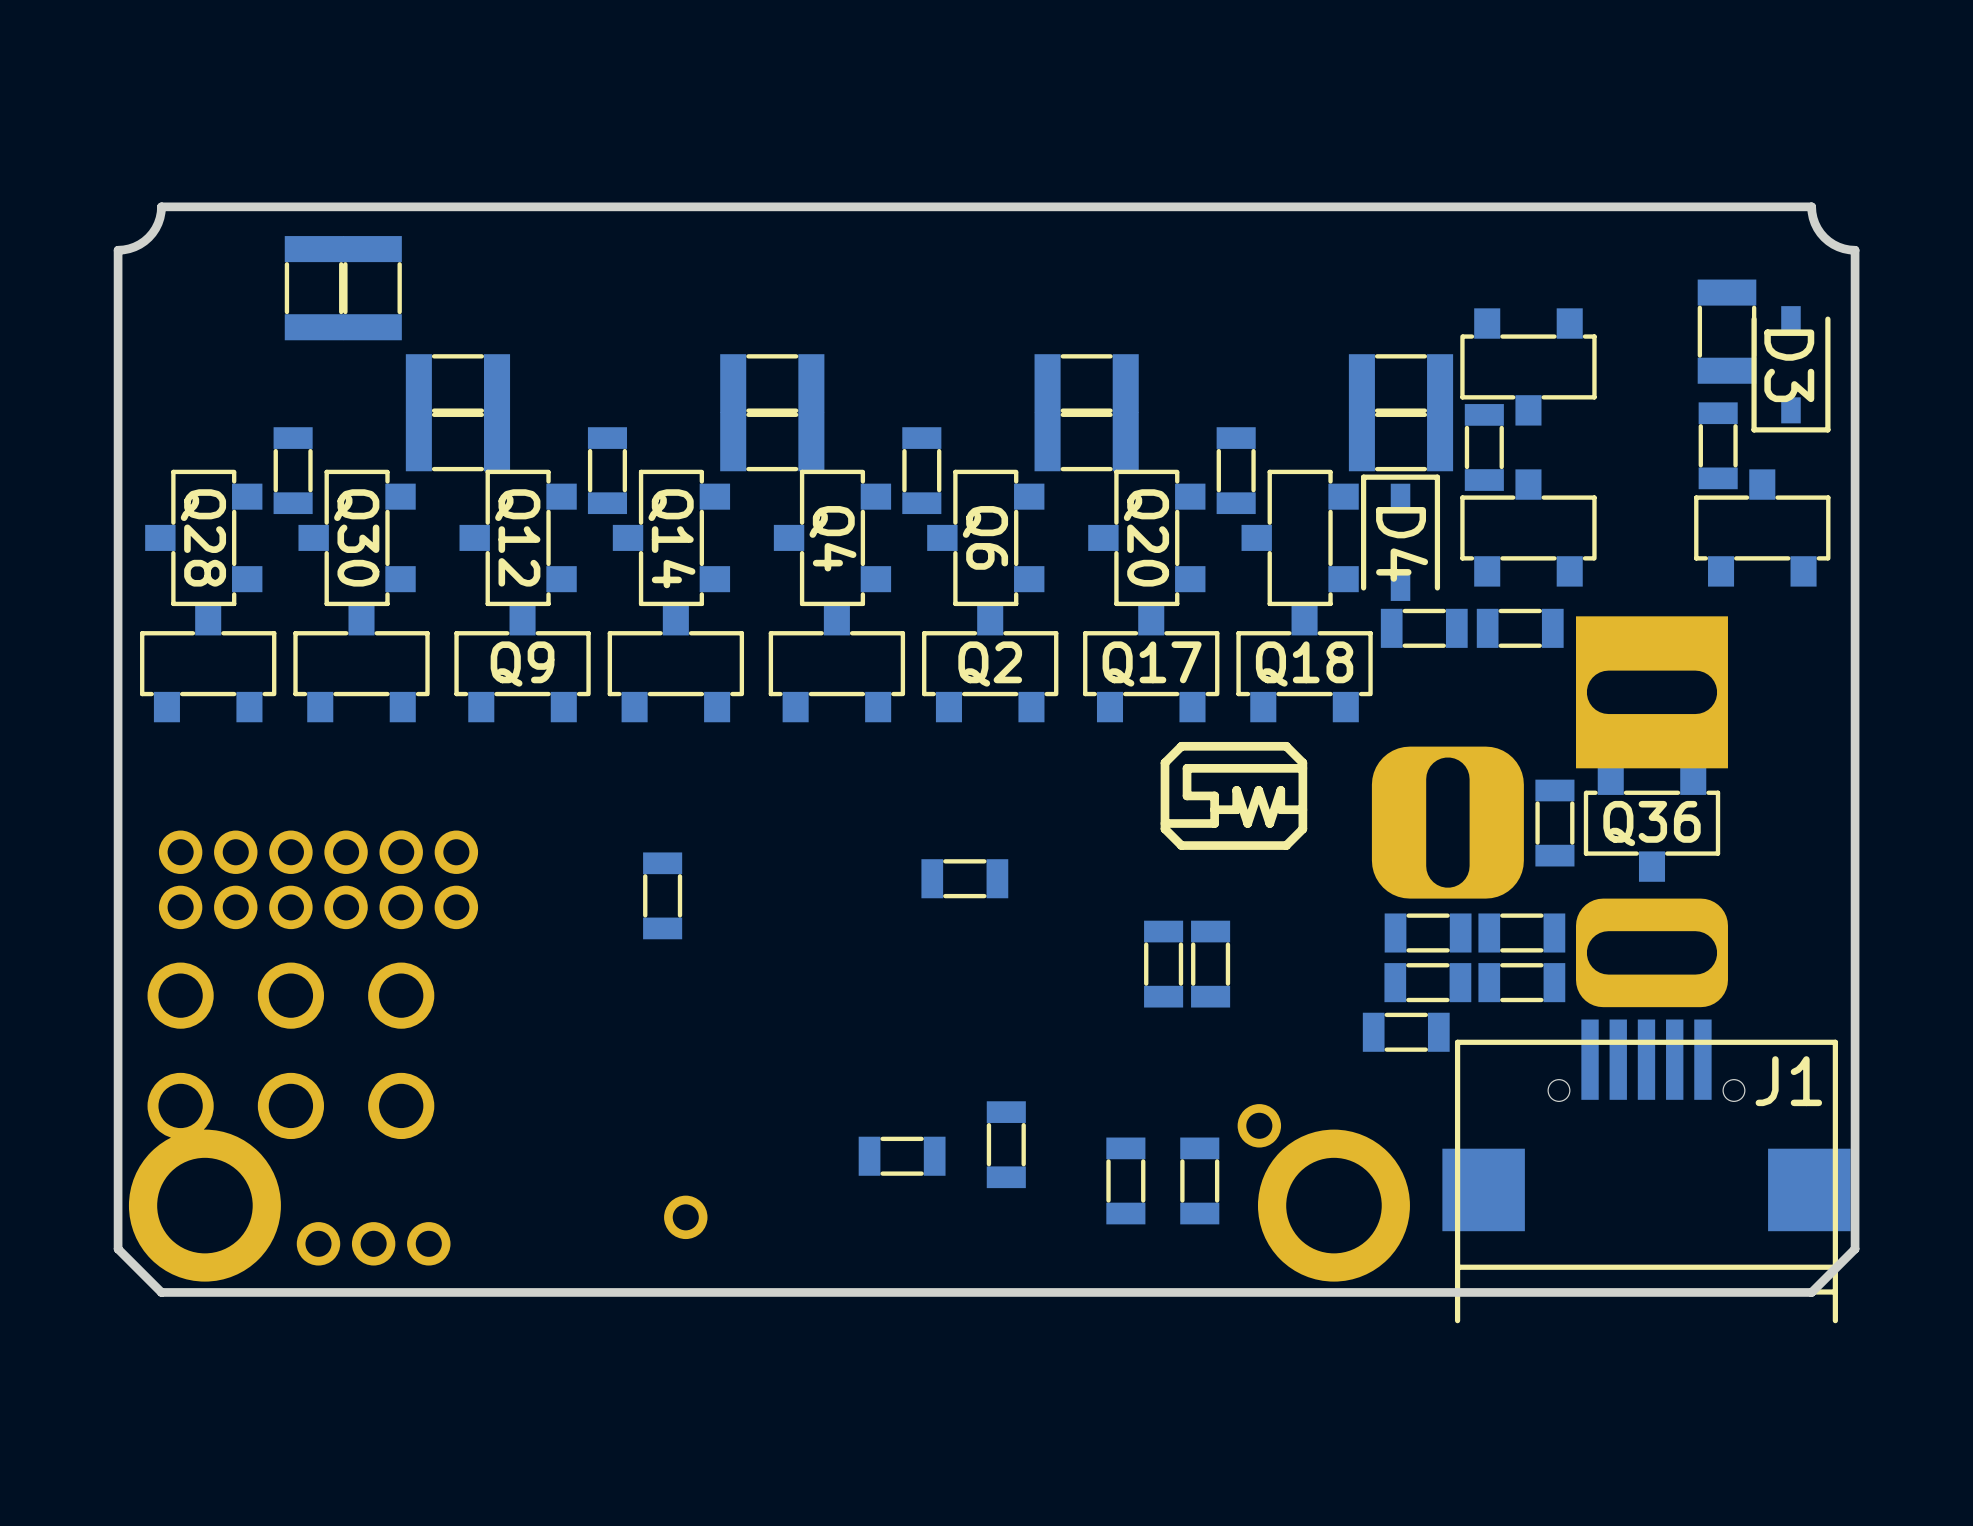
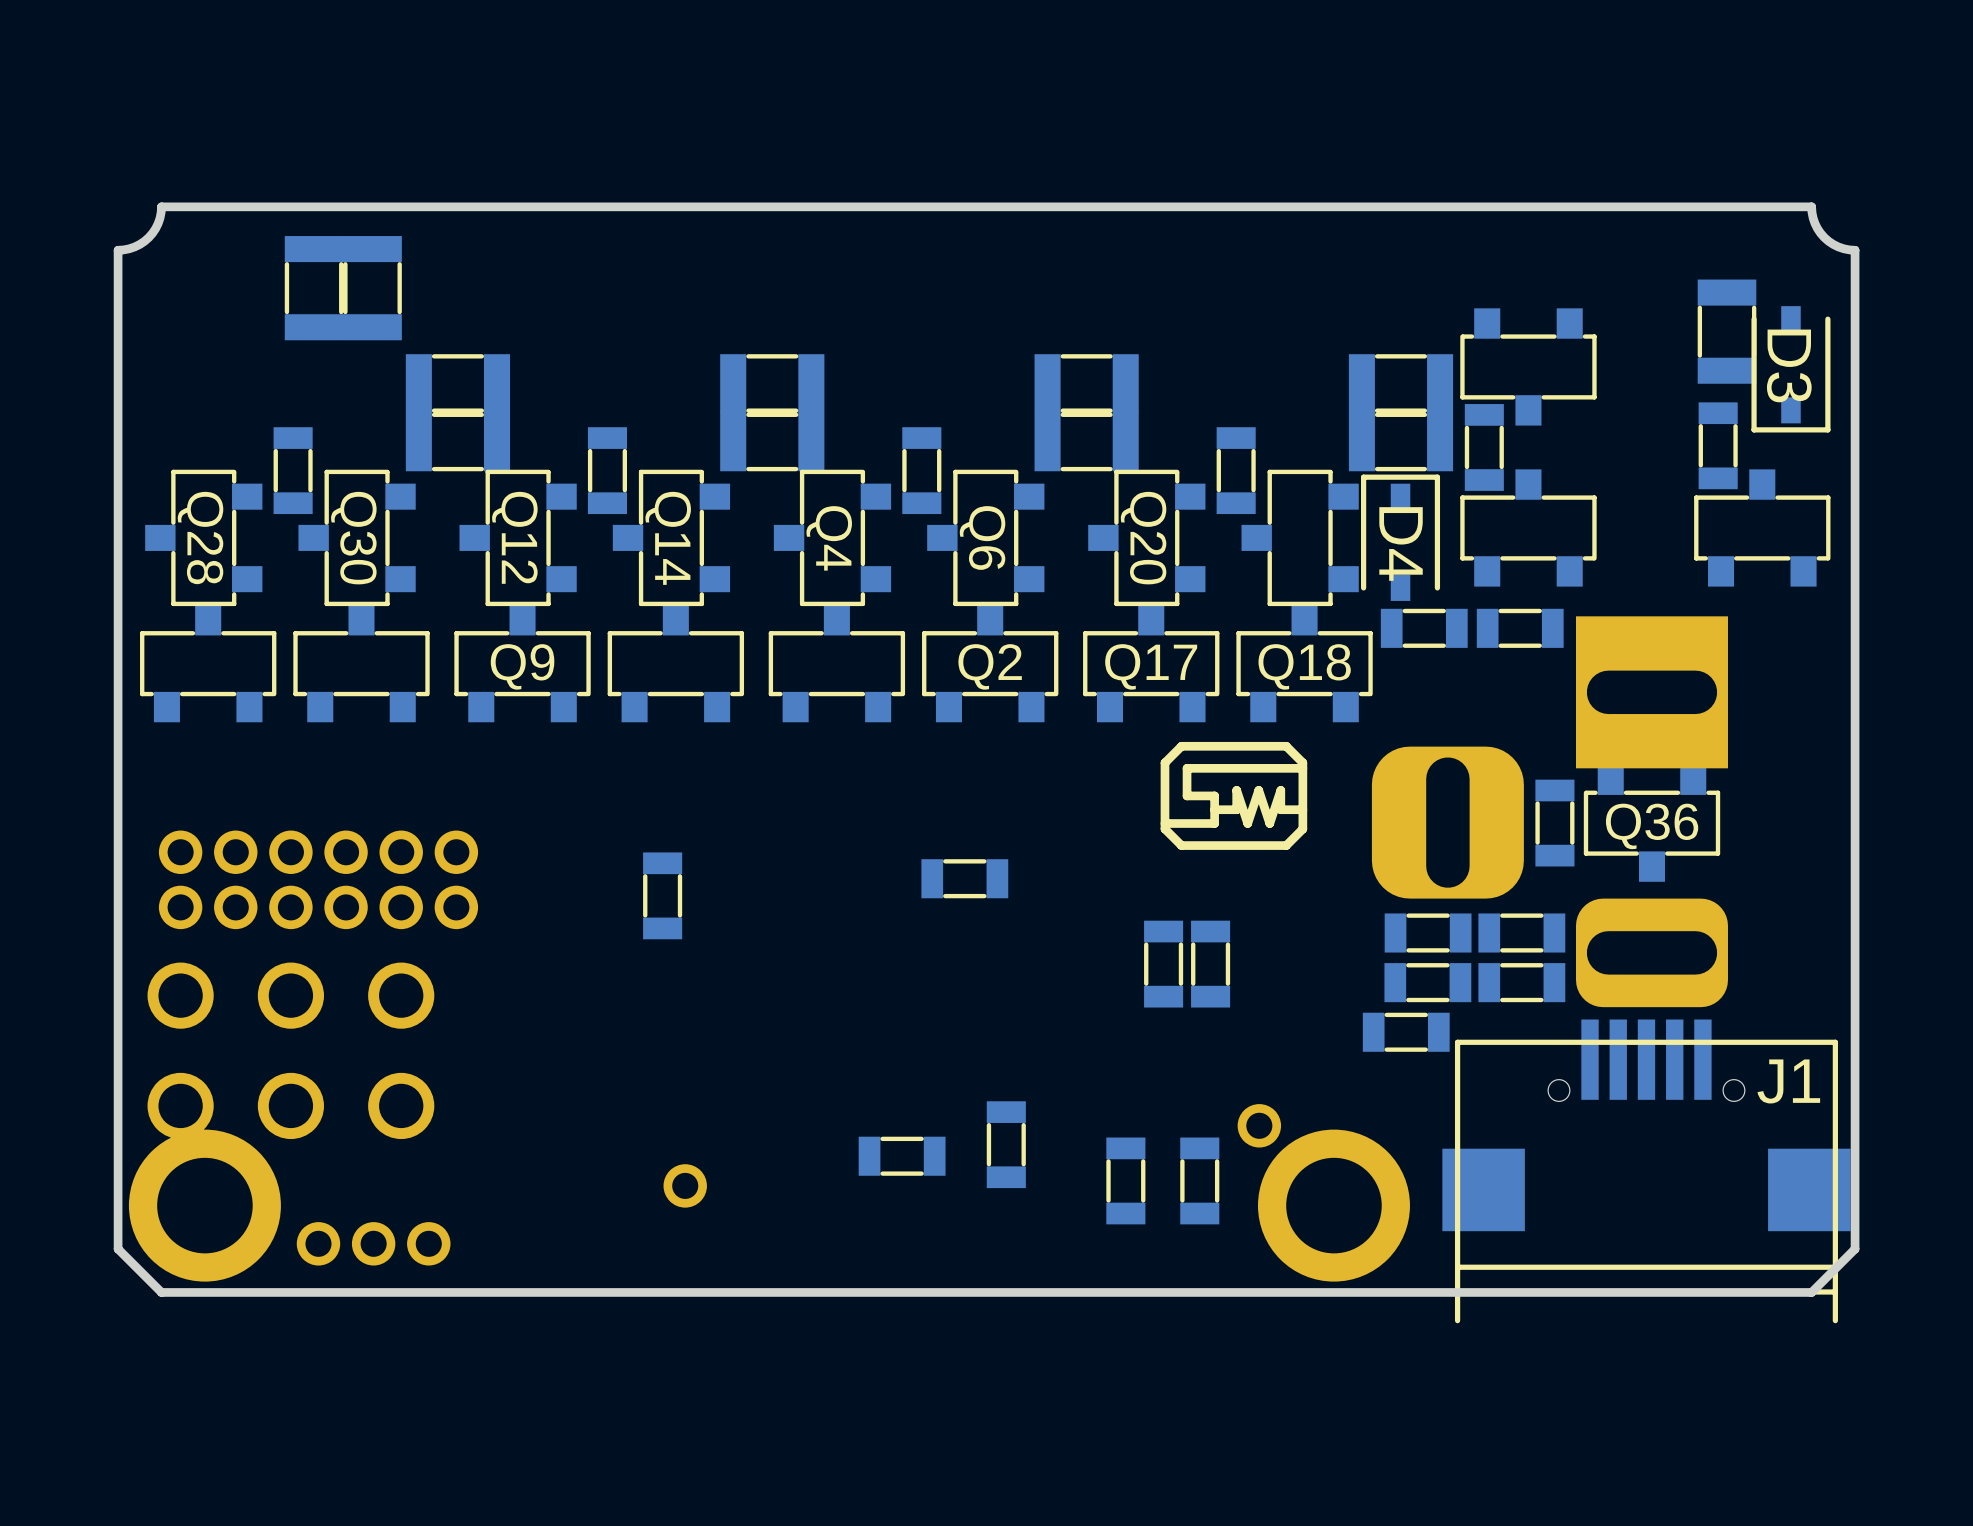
part position: (685, 1217) -> (685, 1185)

